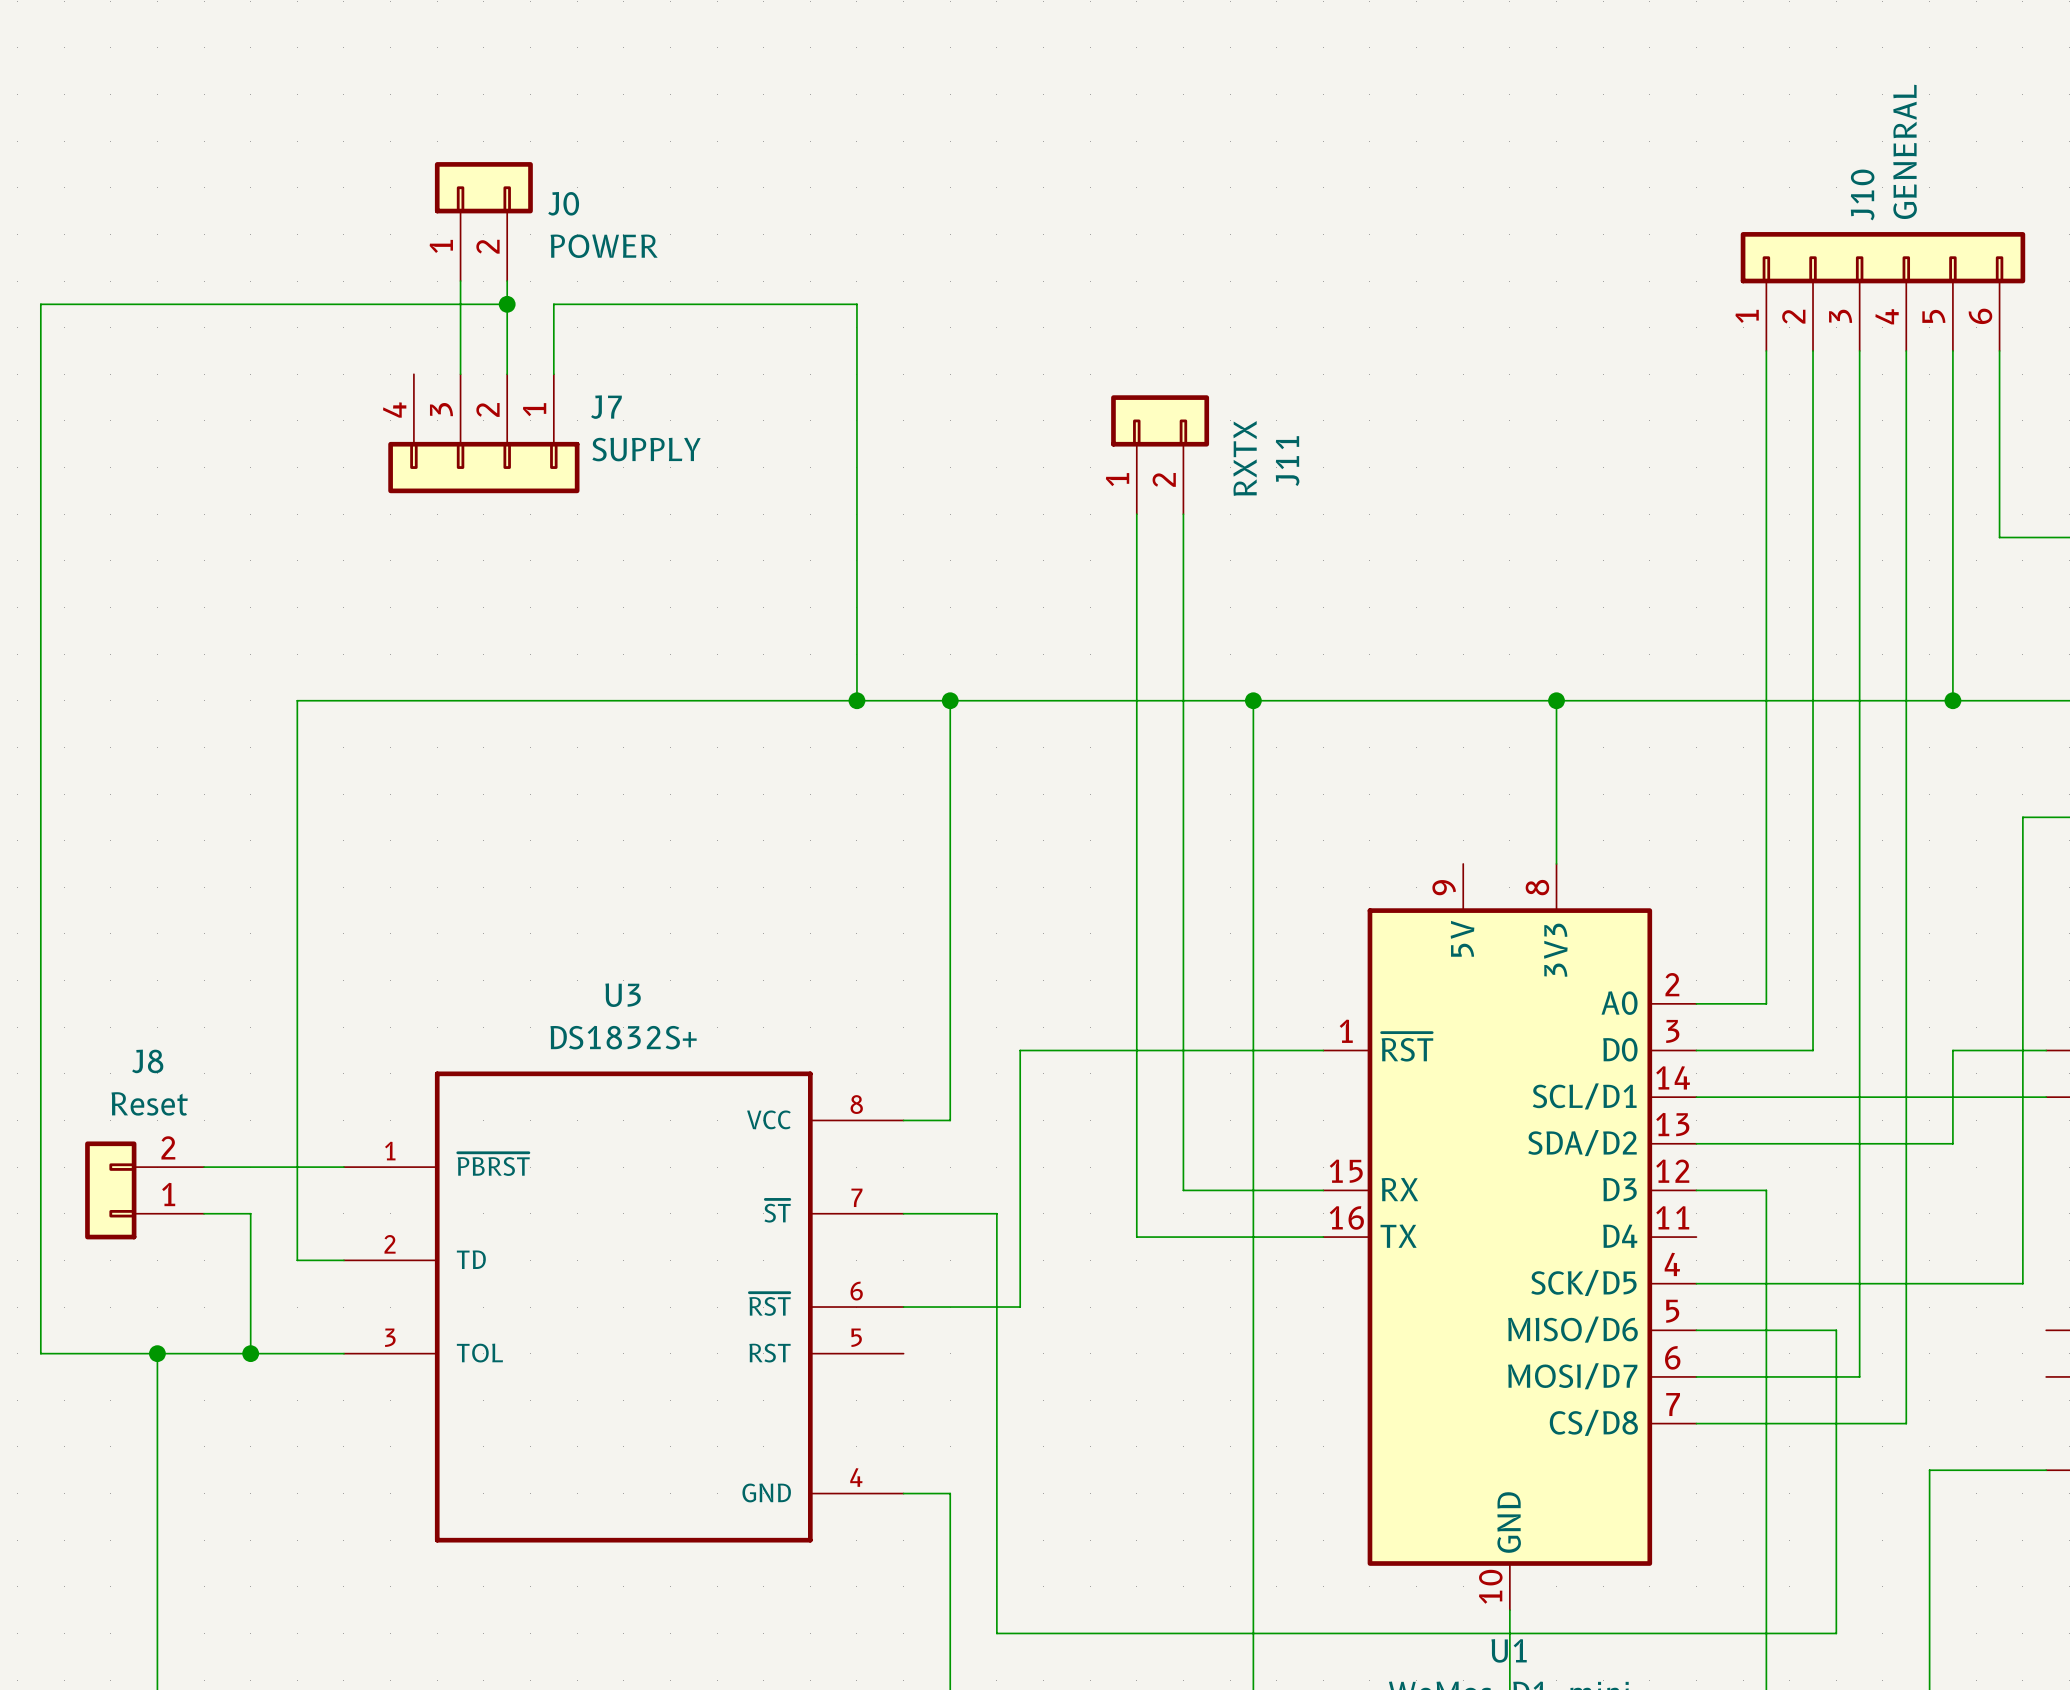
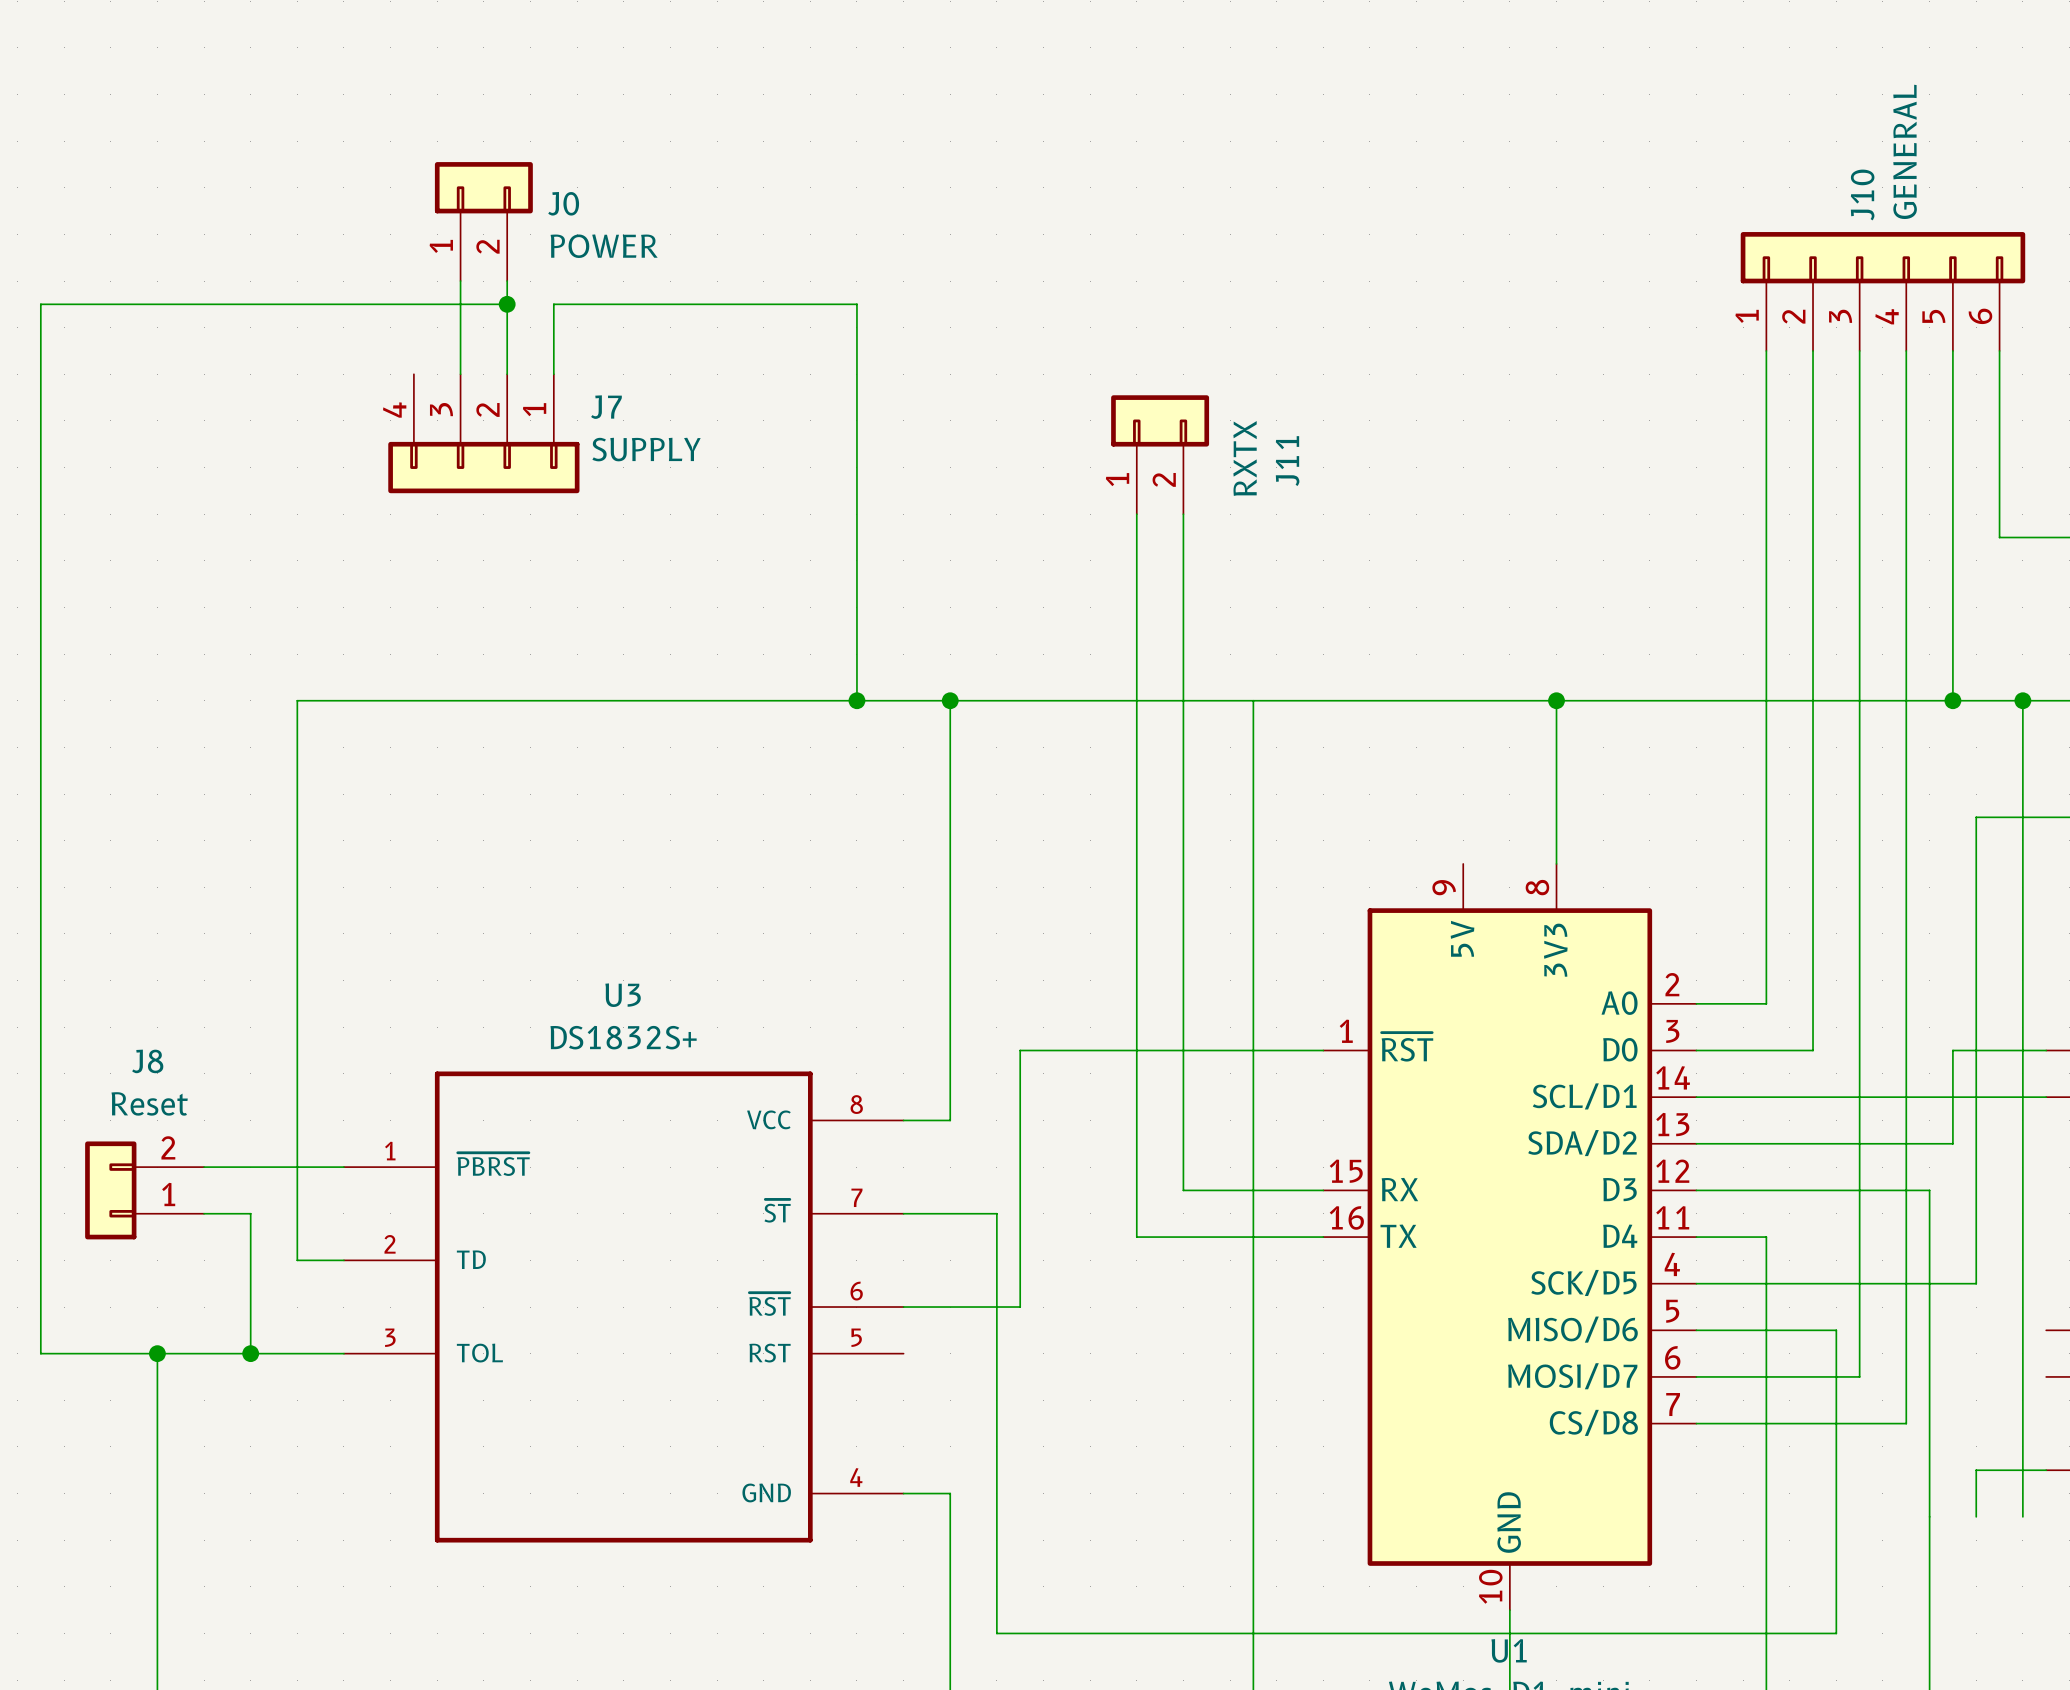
junction: (1253, 700) -> none
wire: none -> (2022, 700) (2022, 817) (1976, 817) (1976, 1283)
junction: none -> (2022, 700)
wire: (1766, 1190) (1766, 1237) -> (1696, 1237) (1766, 1237)
wire: none -> (1766, 1190) (1929, 1190) (1929, 1470)
wire: (1976, 1283) (2022, 1283) -> (2022, 1516) (2022, 1283)
wire: (1929, 1470) (1976, 1470) -> (1976, 1516) (1976, 1470)

